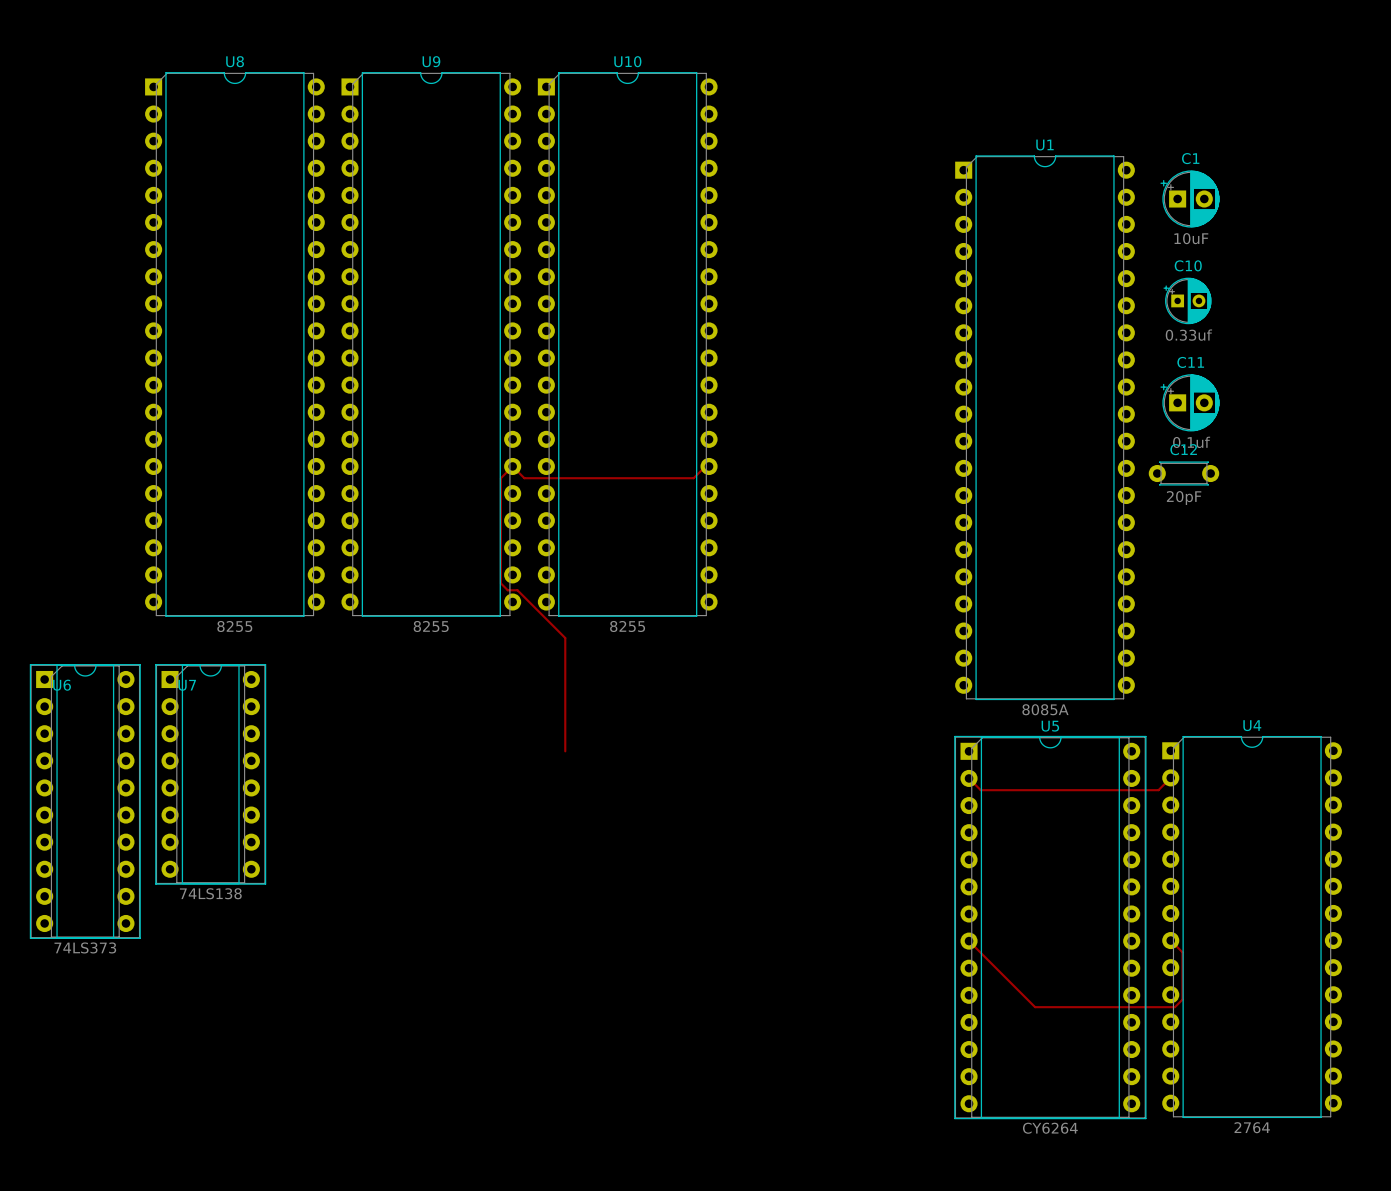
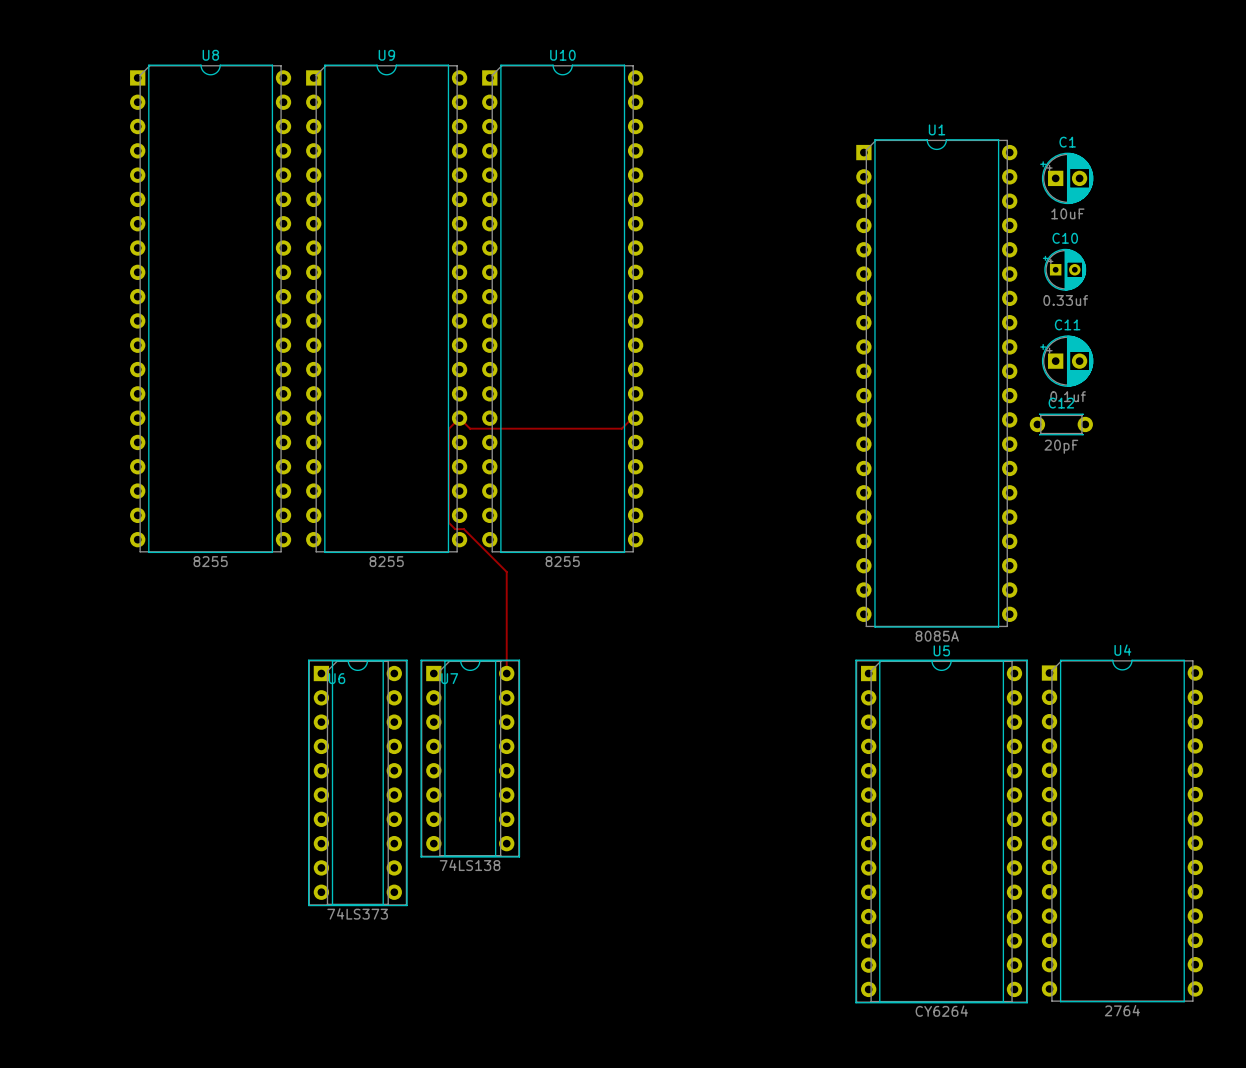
U7 position: (210, 774) -> (470, 758)
top track: (1170, 777) (1158, 790) (980, 790) (969, 778) -> none
U6 position: (85, 801) -> (357, 782)
top track: (1170, 940) (1182, 952) (1182, 999) (1174, 1007) (1035, 1007) (969, 941) -> none

